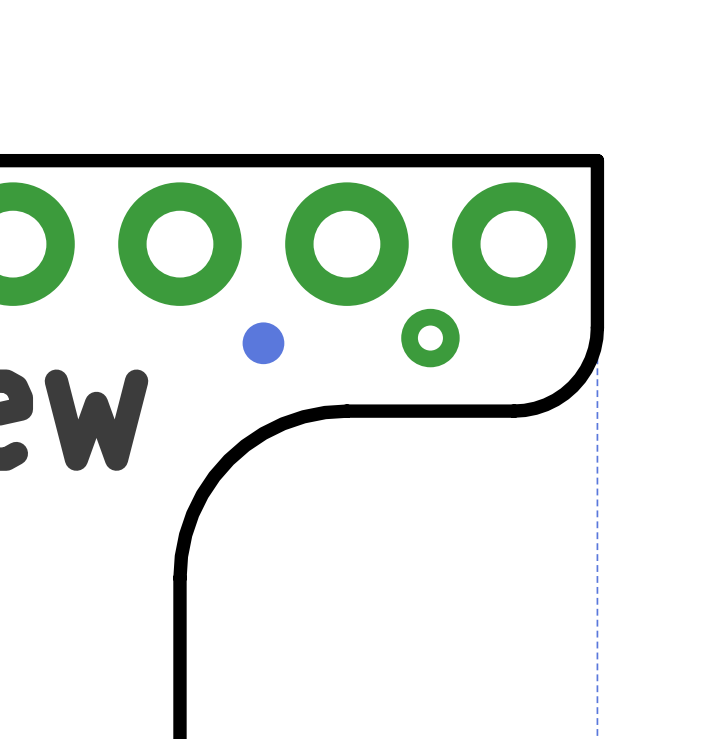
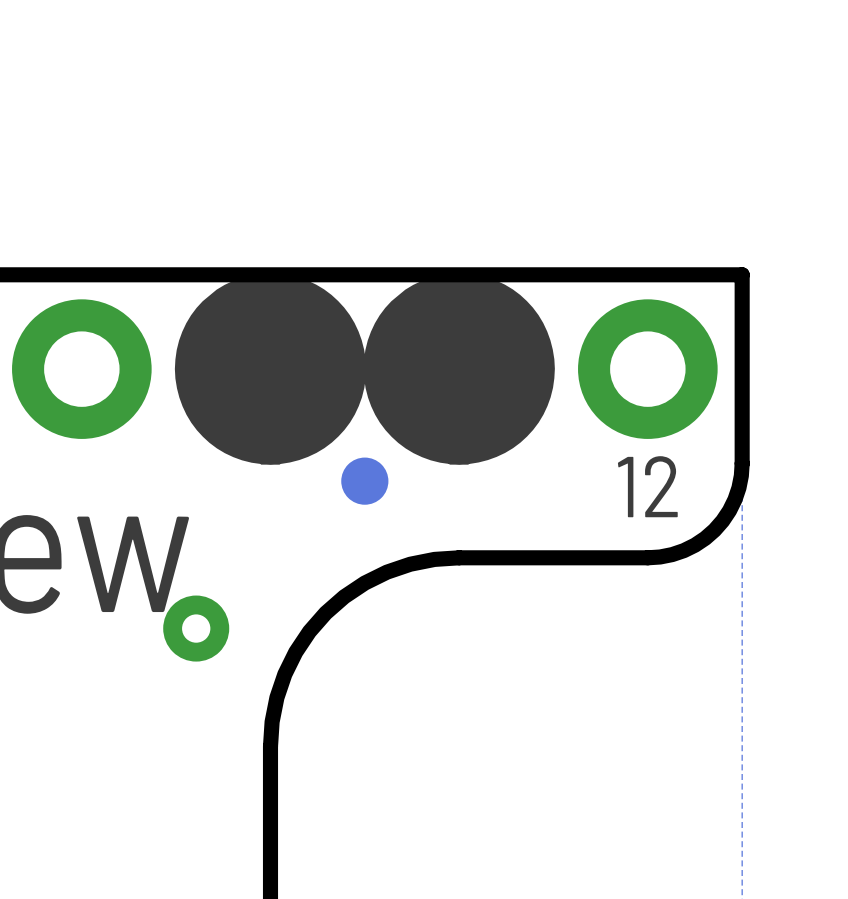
drawing: none -> [174, 273, 555, 465]
via: (430, 338) -> none
text: none -> 12 (647, 486)
via: none -> (196, 628)

